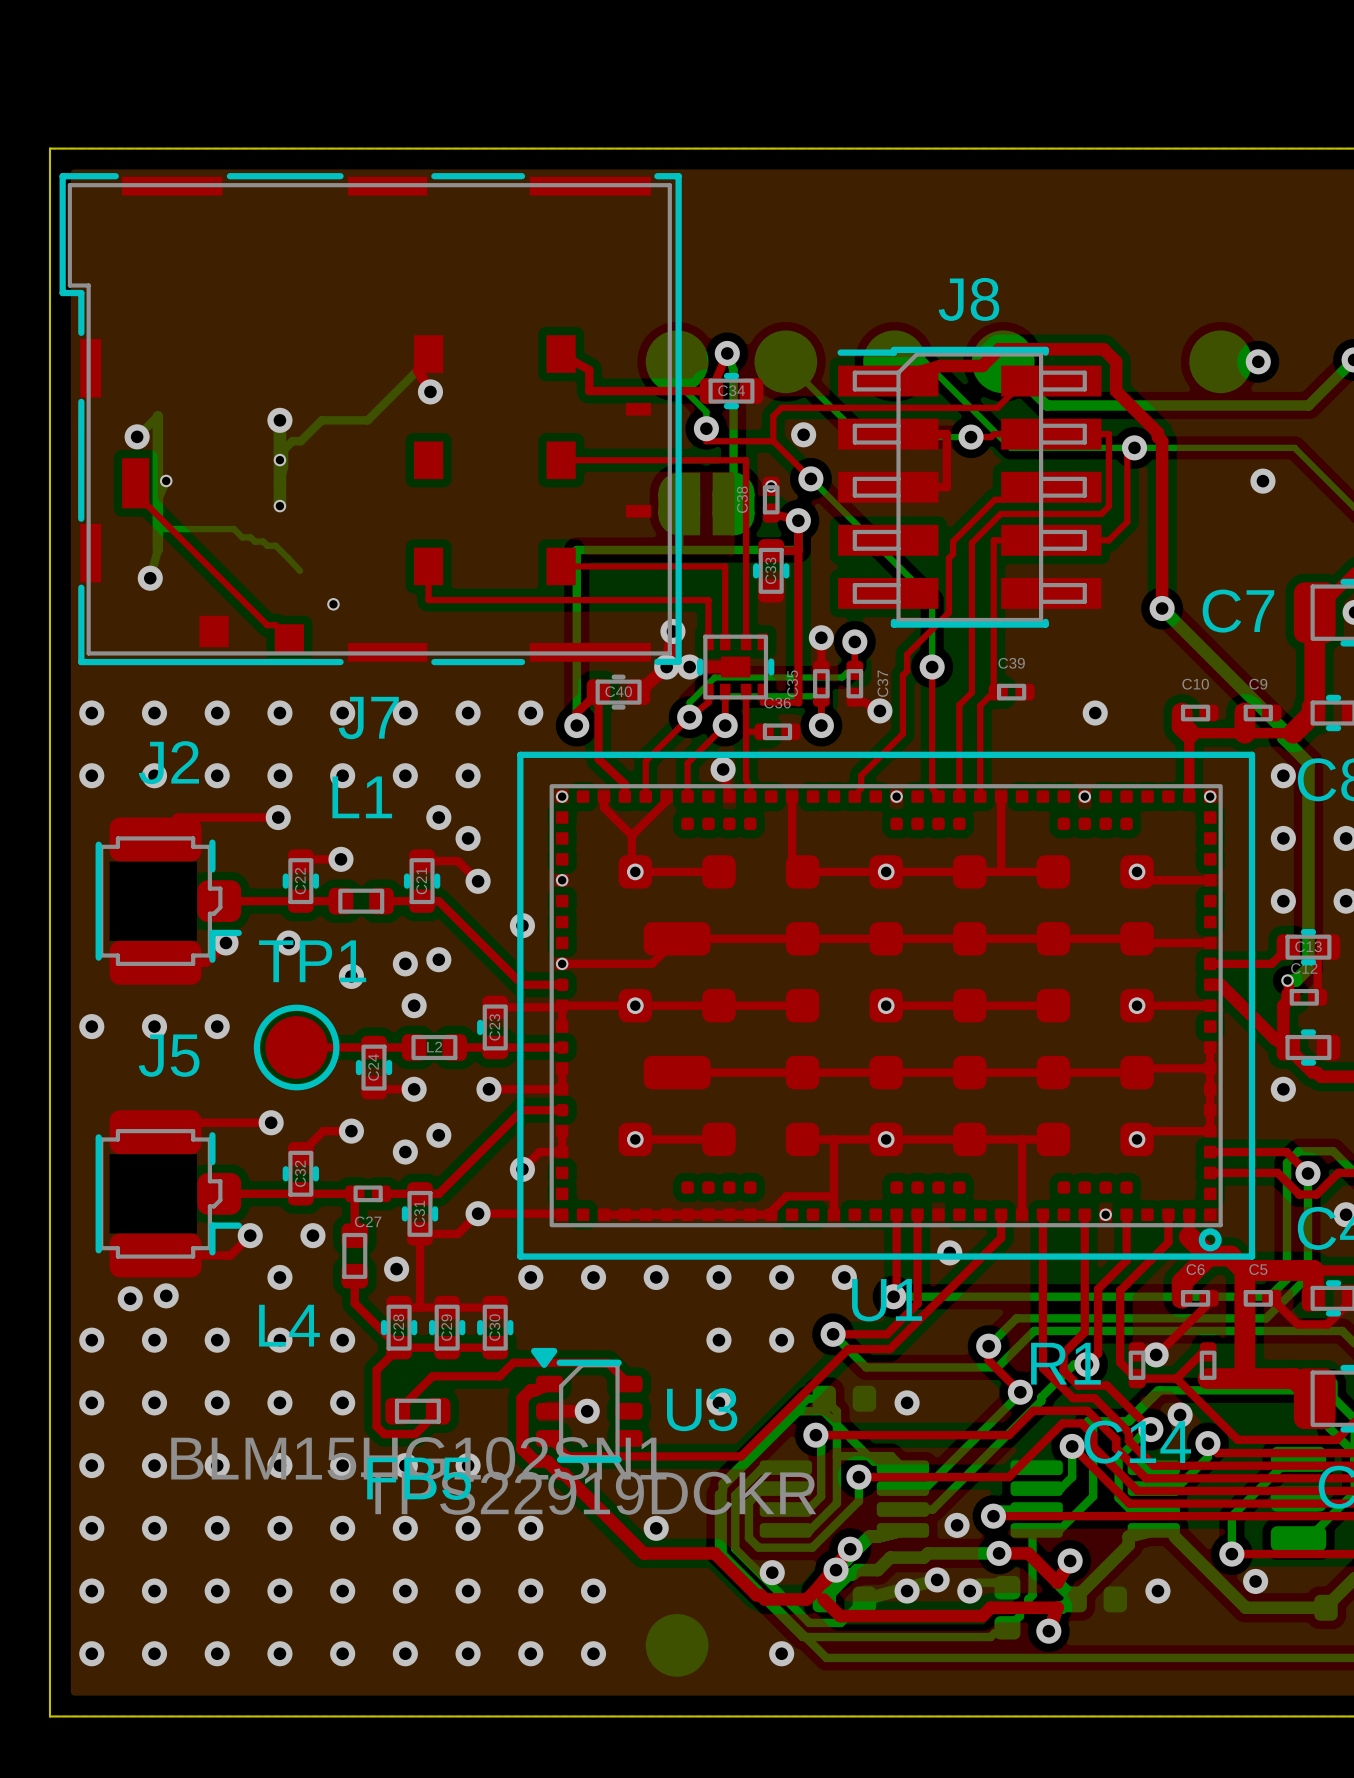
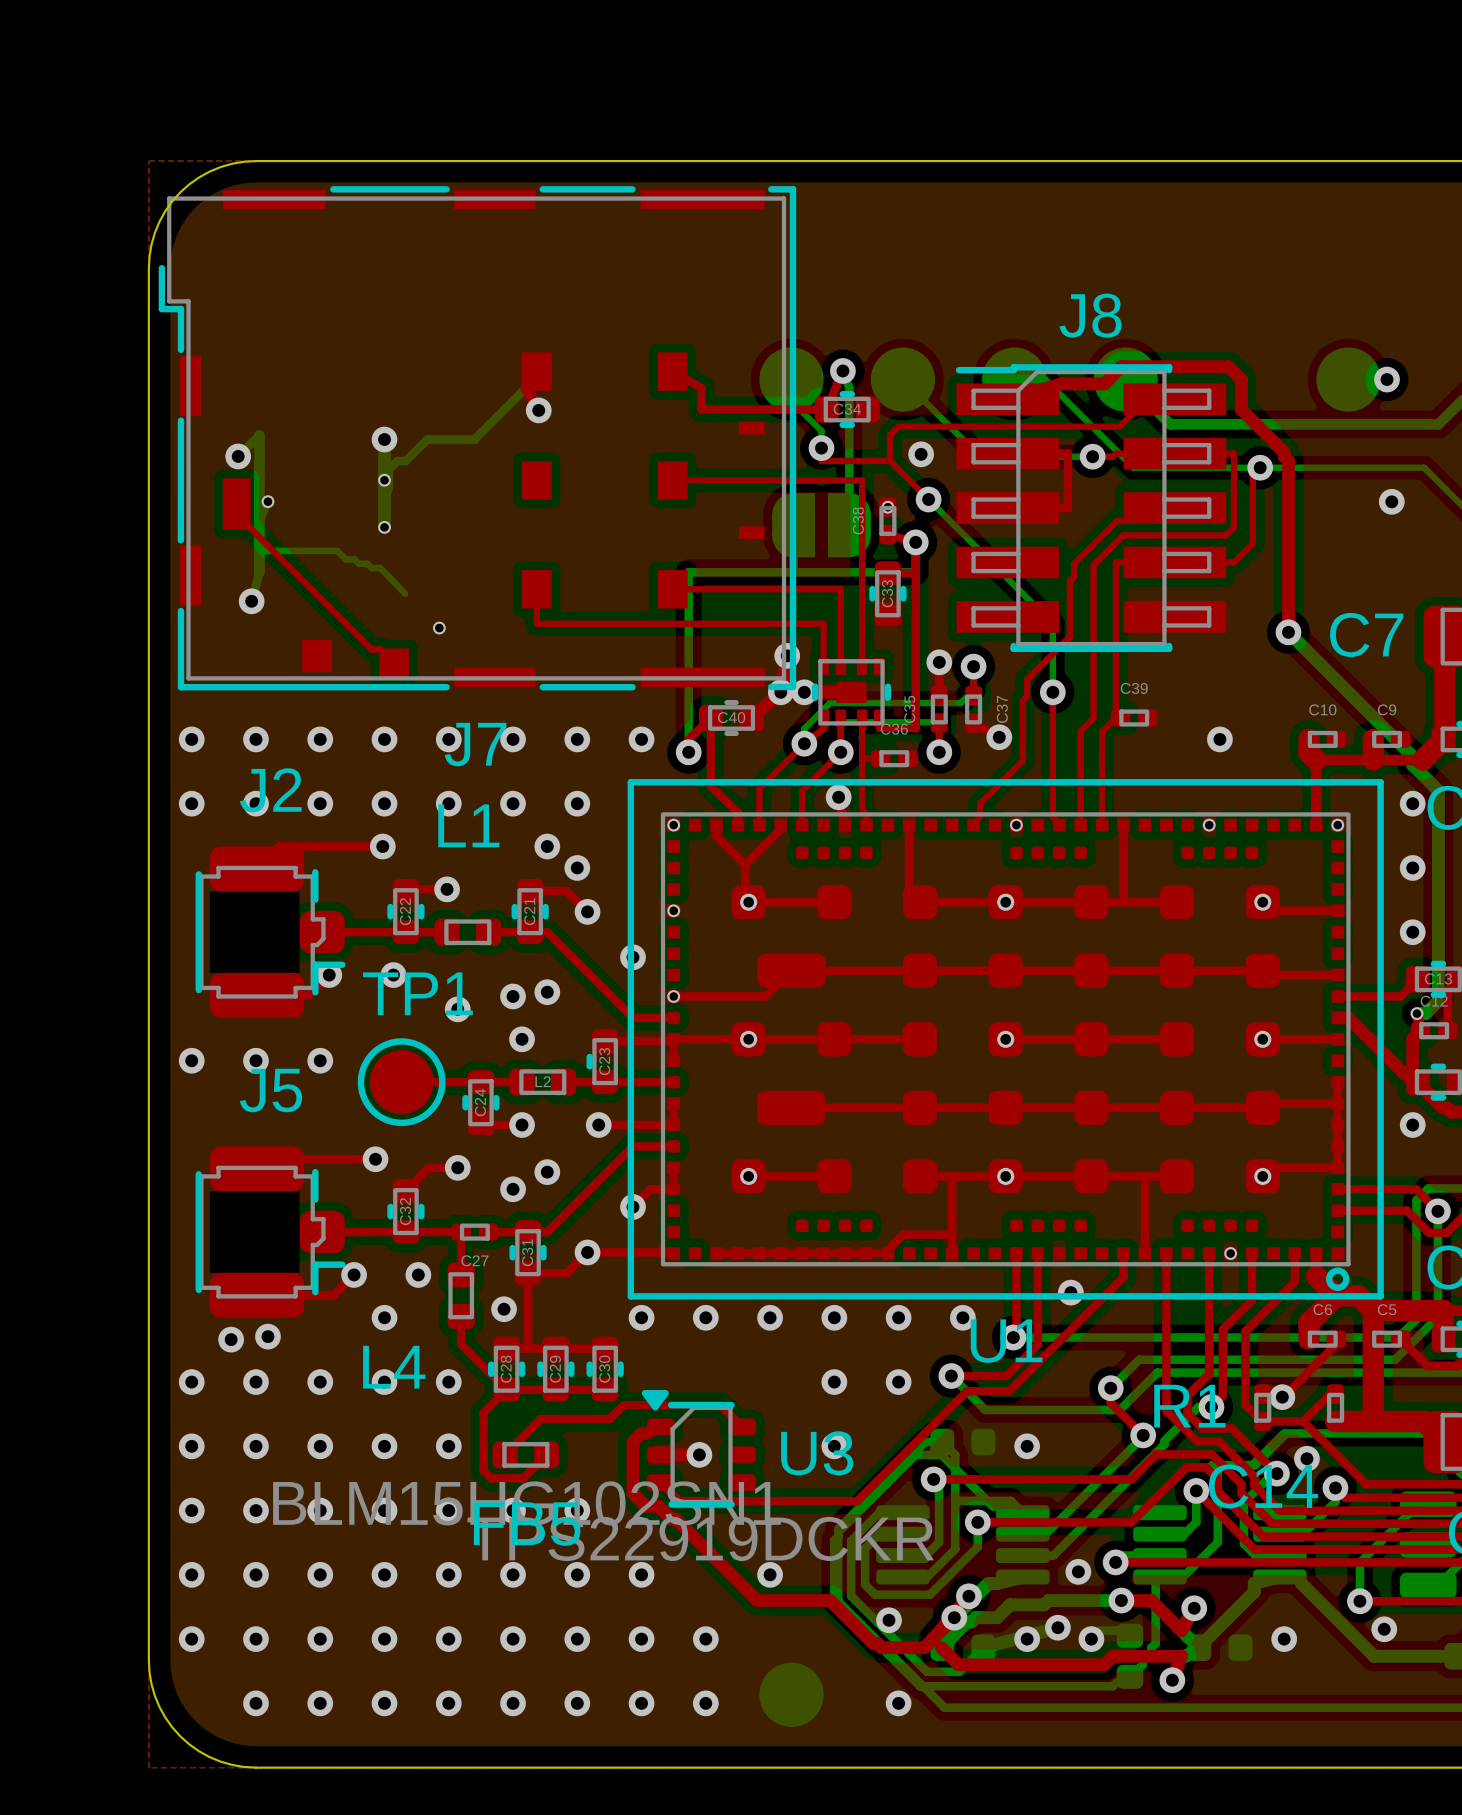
board edge: (154, 148) (49, 148) (49, 253) -> (255, 161) (220, 167) (199, 177) (180, 192) (165, 211) (154, 232) (148, 268)
J7 footprint: [59, 173, 682, 666] -> [158, 186, 797, 691]
board edge: (49, 1611) (49, 1716) (154, 1716) -> (148, 1660) (151, 1684) (159, 1707) (180, 1736) (209, 1757) (232, 1764) (255, 1767)
via: (91, 1653) -> none

